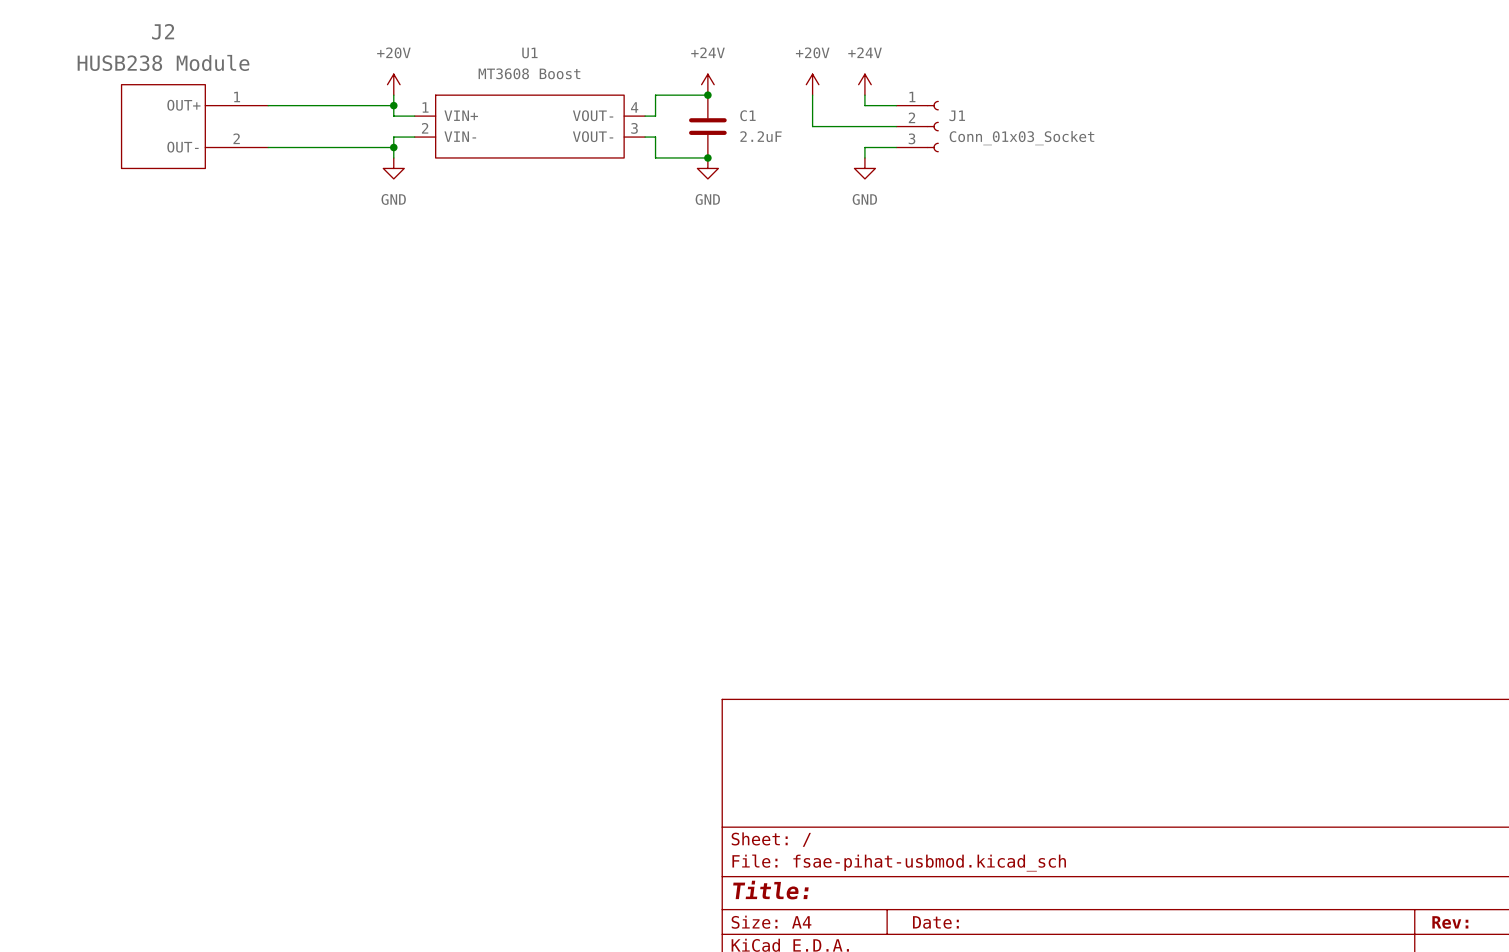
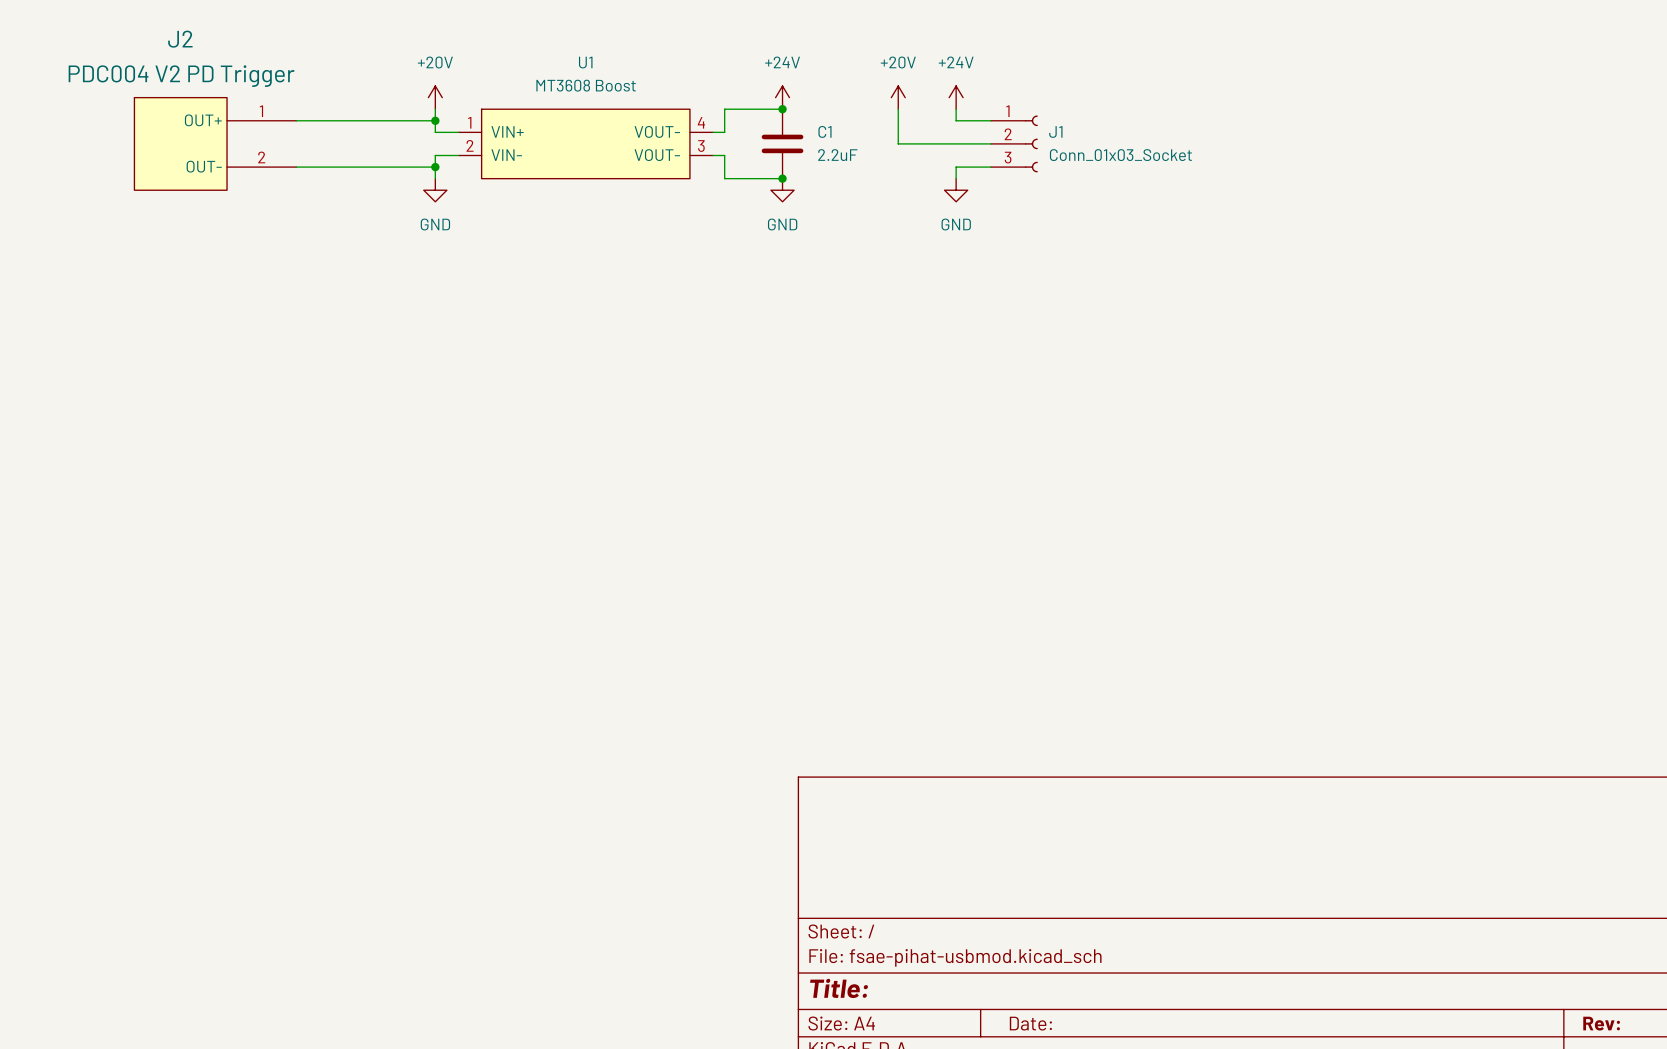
J2 value: HUSB238 Module (163, 62) -> PDC004 V2 PD Trigger (181, 76)

